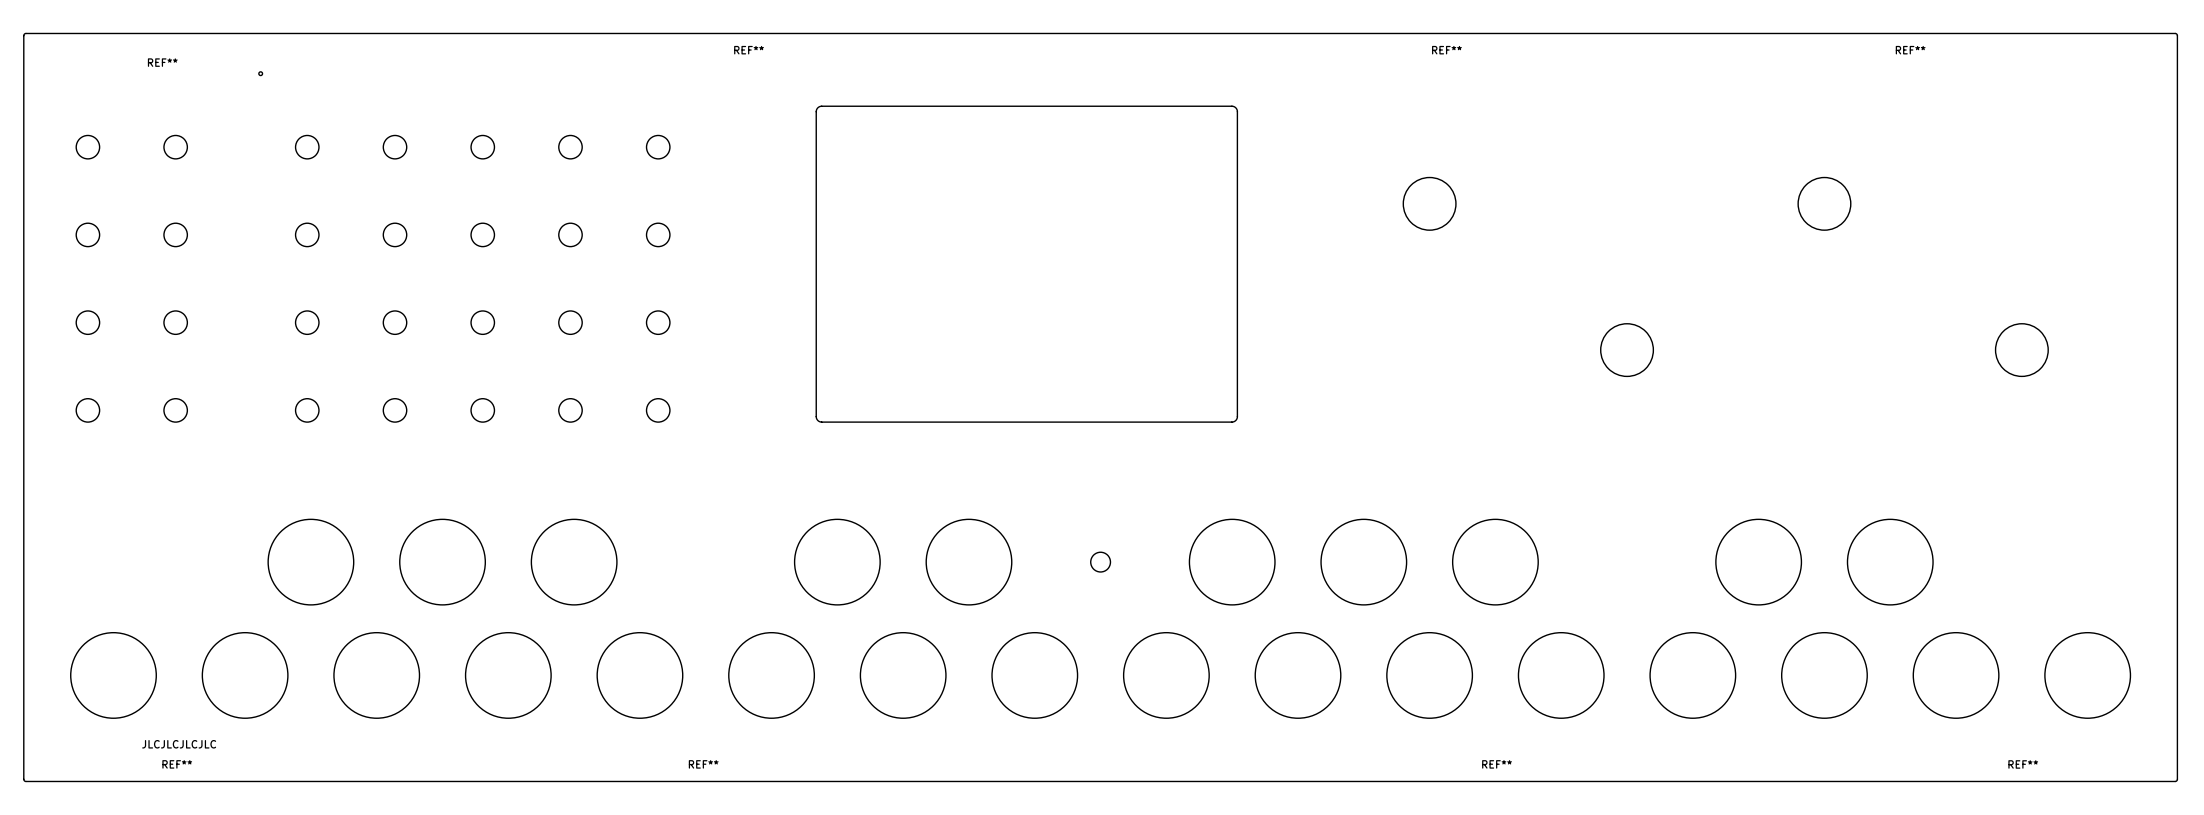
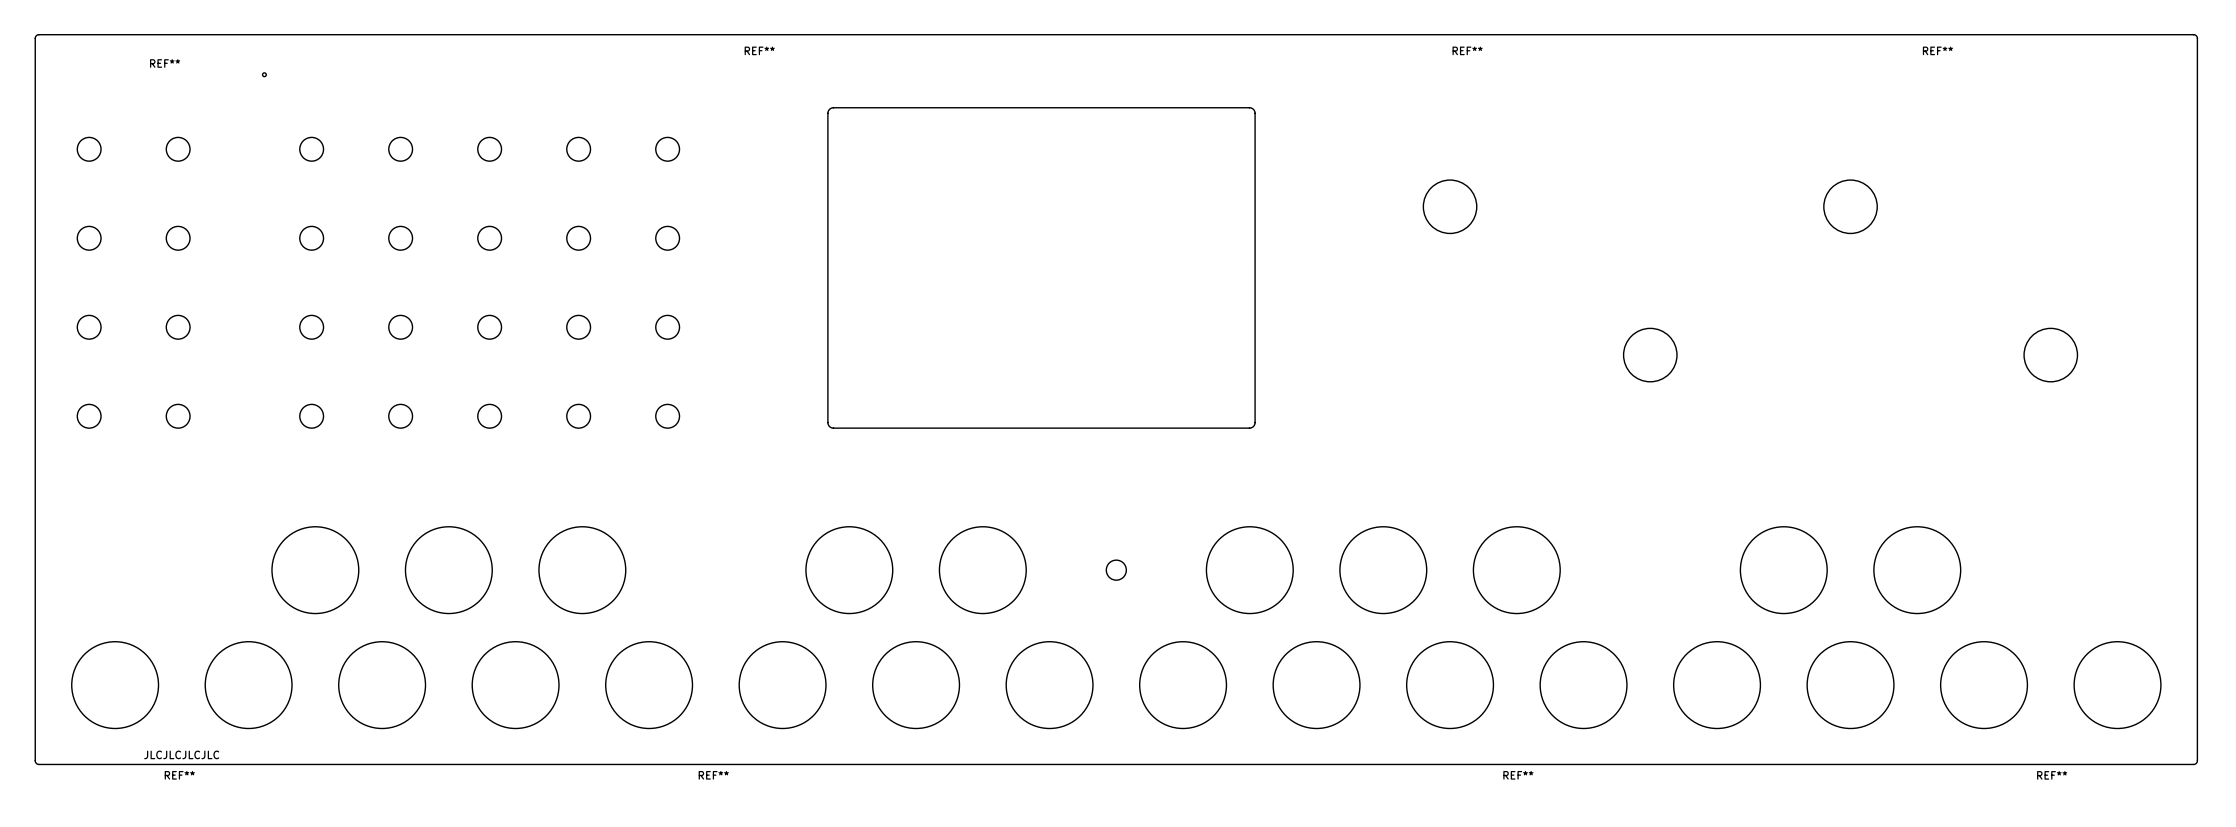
board edge: (2175, 33) (25, 33) (23, 780) (2176, 781) (2177, 35) (2175, 33) -> (2193, 34) (2197, 38) (2197, 760) (2194, 764) (38, 764) (35, 761) (35, 38) (38, 34) (2193, 34)

